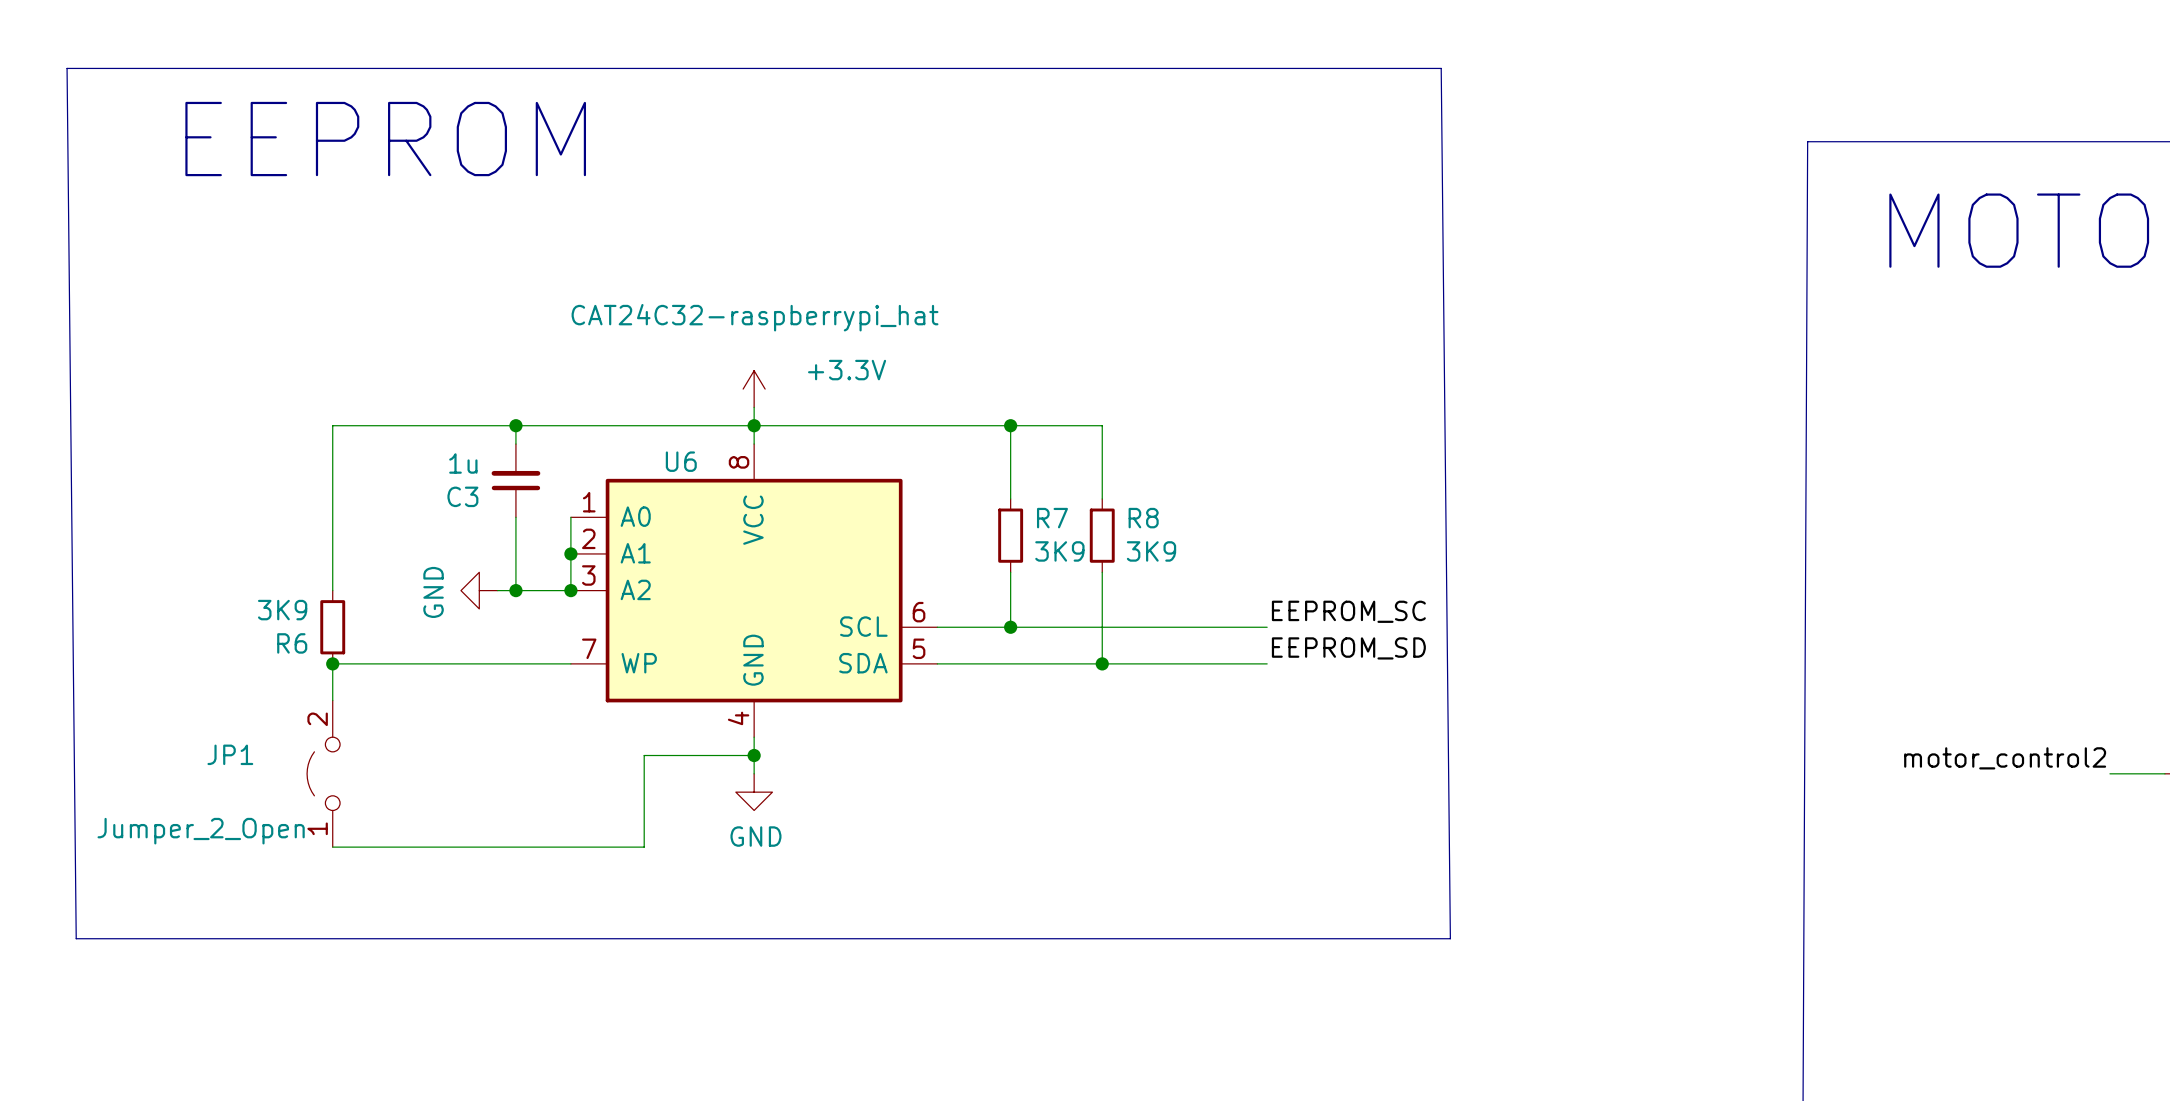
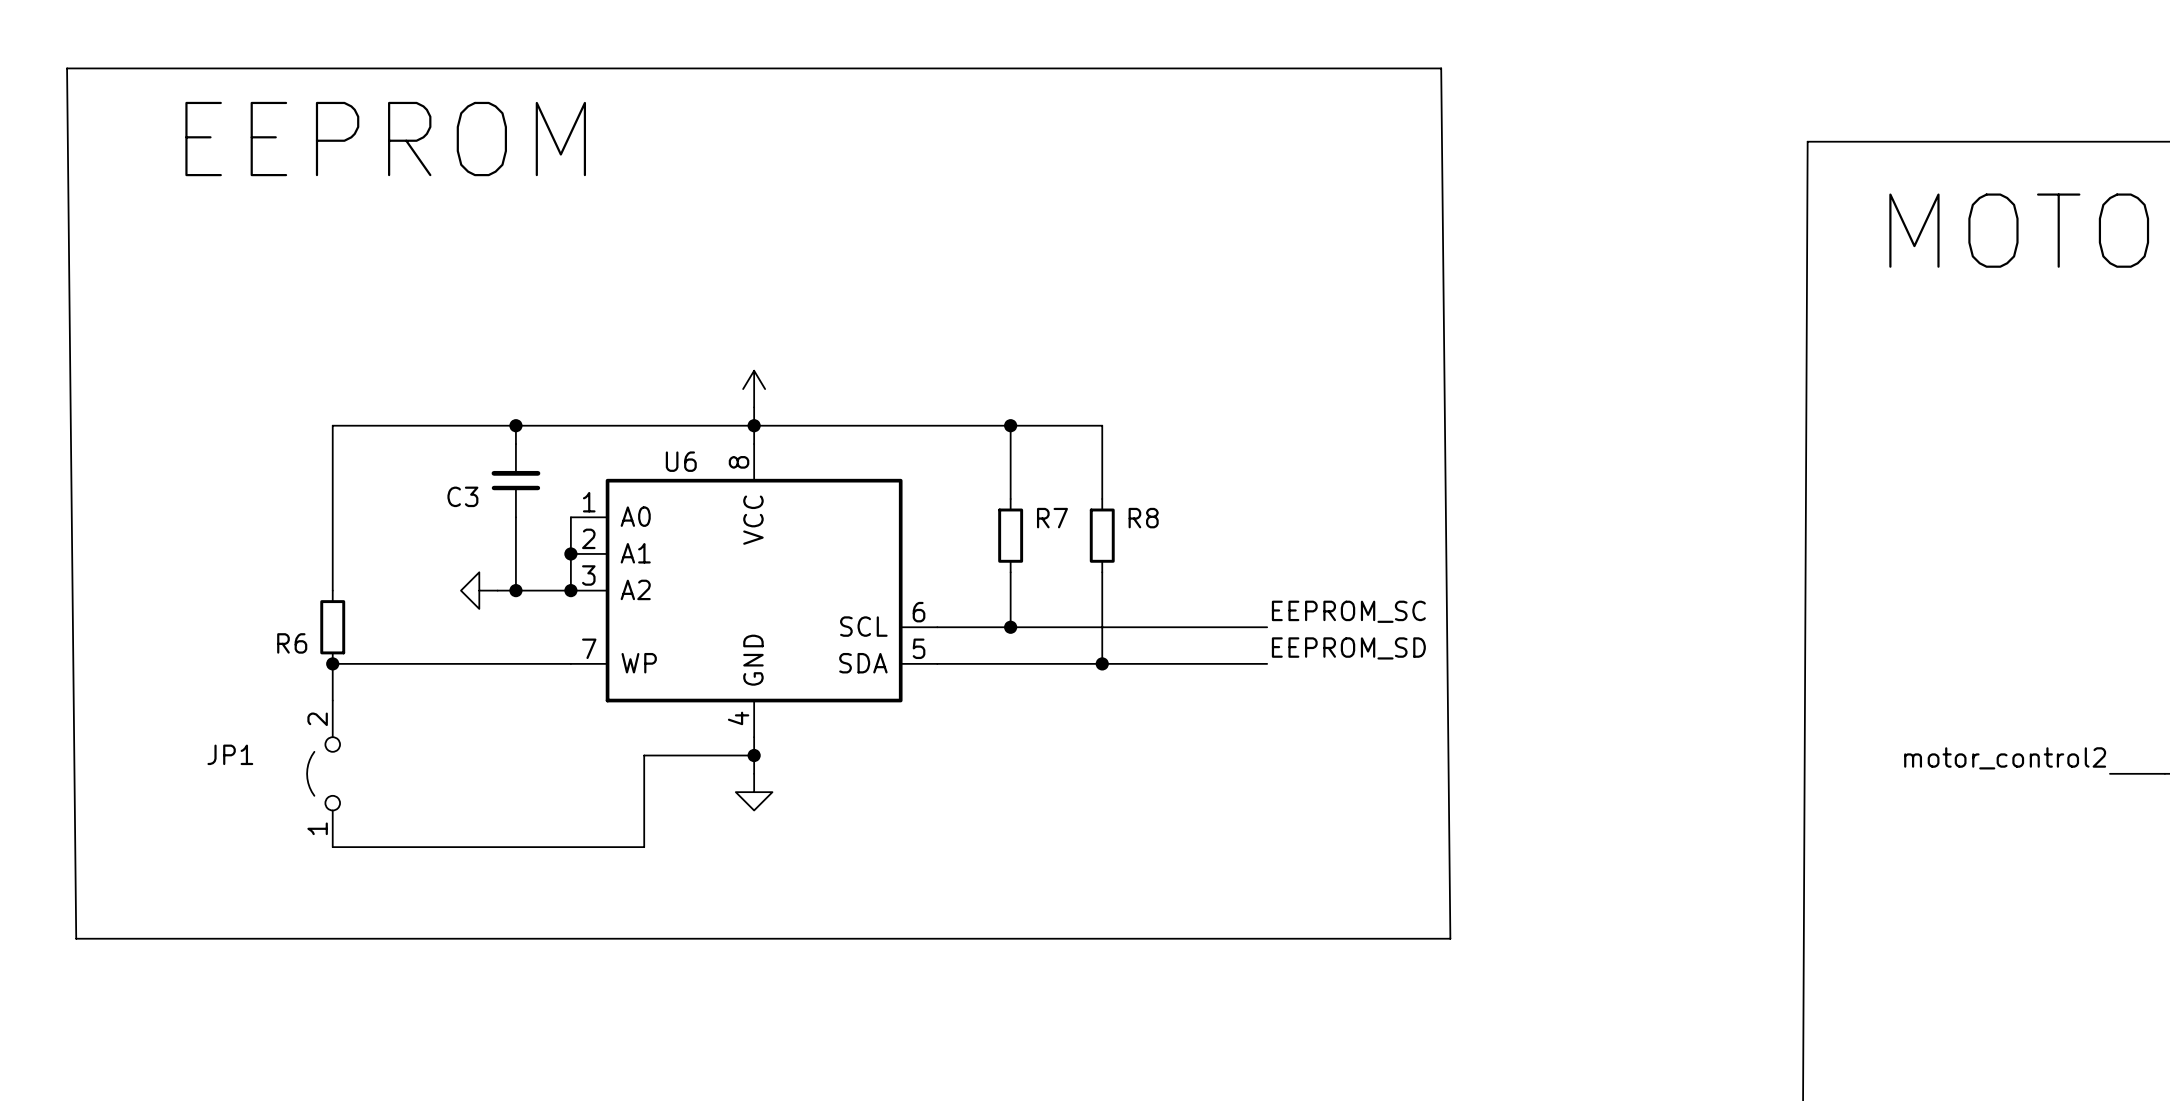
U6 value: CAT24C32-raspberrypi_hat (755, 317) -> none
power symbol text: +3.3V (847, 370) -> none
C3 value: 1u (463, 463) -> none
R7 value: 3K9 (1059, 551) -> none
R8 value: 3K9 (1151, 551) -> none
power symbol text: GND (433, 592) -> none
R6 value: 3K9 (282, 610) -> none
JP1 value: Jumper_2_Open (201, 831) -> none
power symbol text: GND (755, 836) -> none

